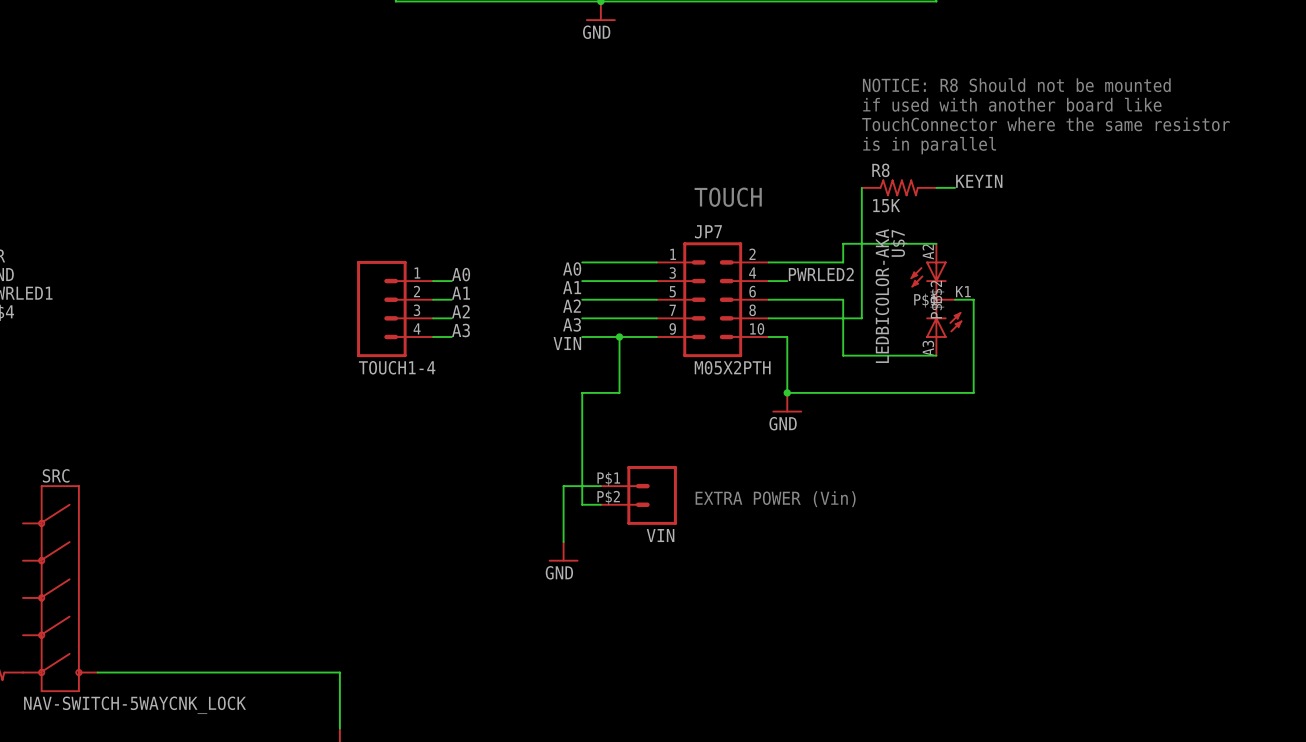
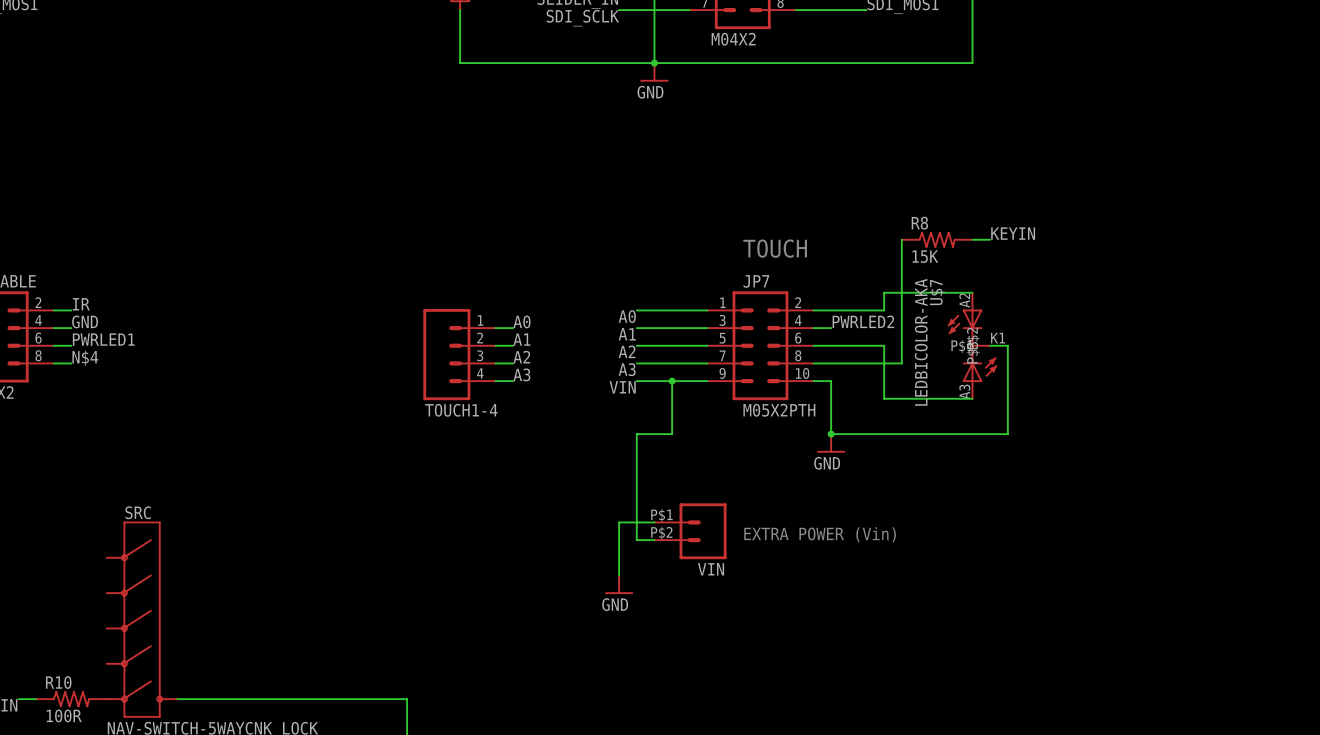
text: NOTICE: R8 Should not be mounted (1016, 85) -> none
text: if used with another board like (1012, 104) -> none
text: TouchConnector where the same resistor (1045, 124) -> none
text: is in parallel (929, 145) -> none

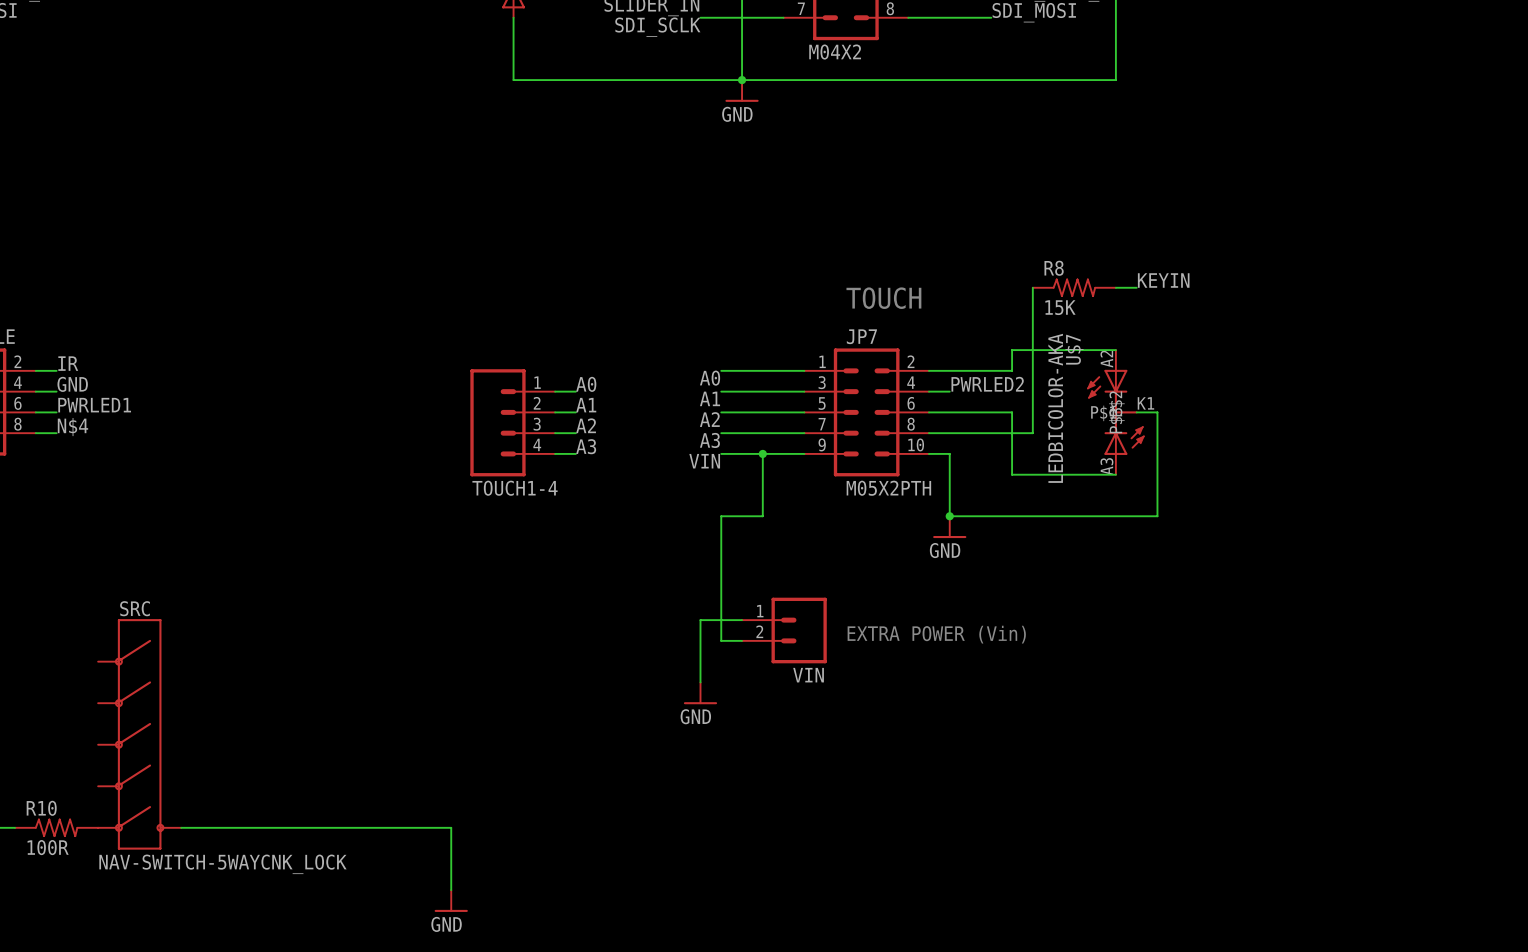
VIN pin number: P$1 (661, 515) -> 1 (760, 611)
VIN pin number: P$2 (661, 533) -> 2 (759, 631)

